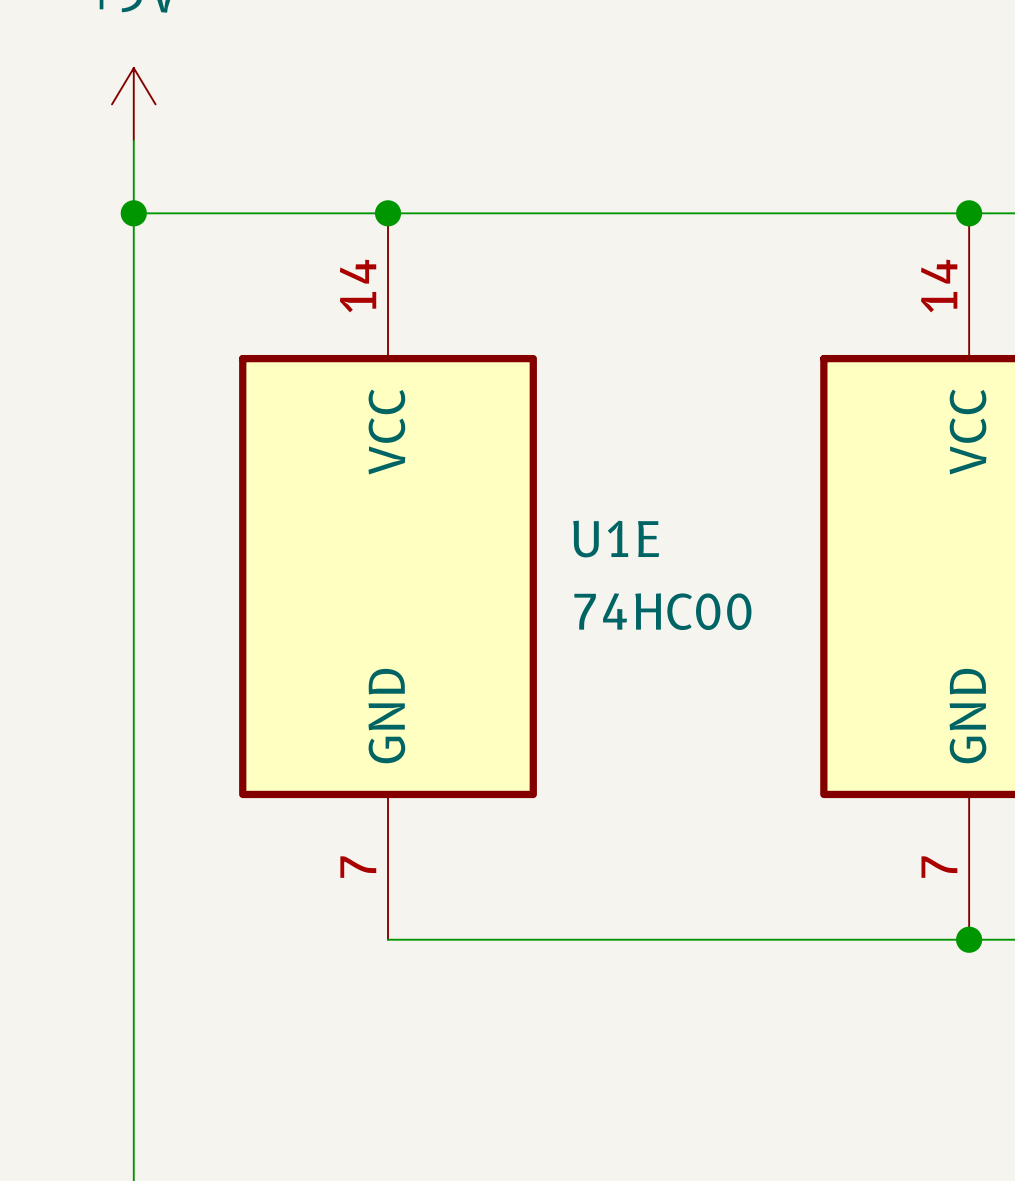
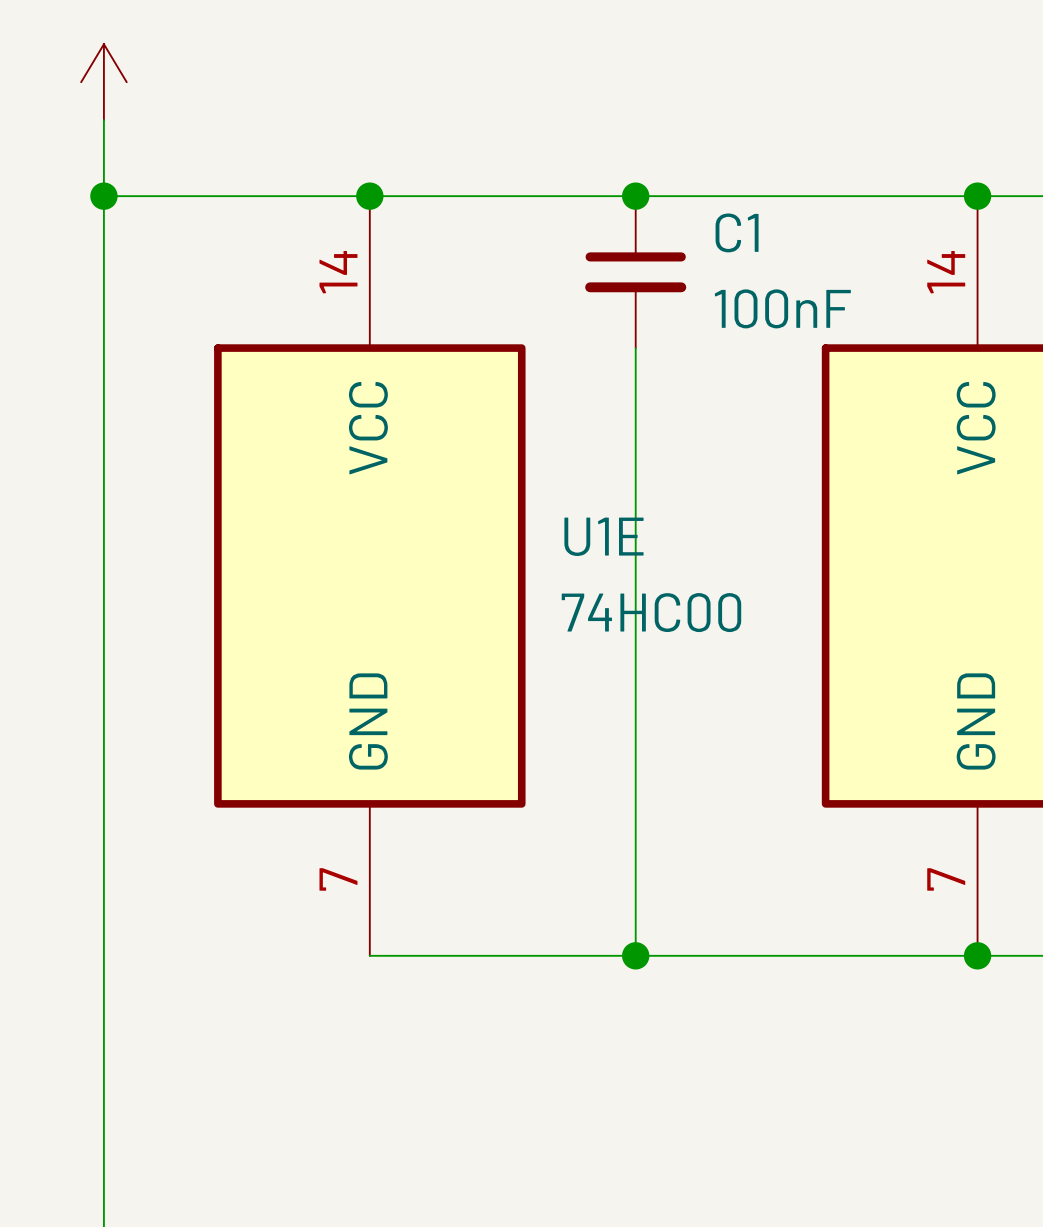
junction: none -> (635, 196)
C1: none -> 100nF (635, 272)
wire: none -> (635, 348) (635, 955)
junction: none -> (635, 955)

